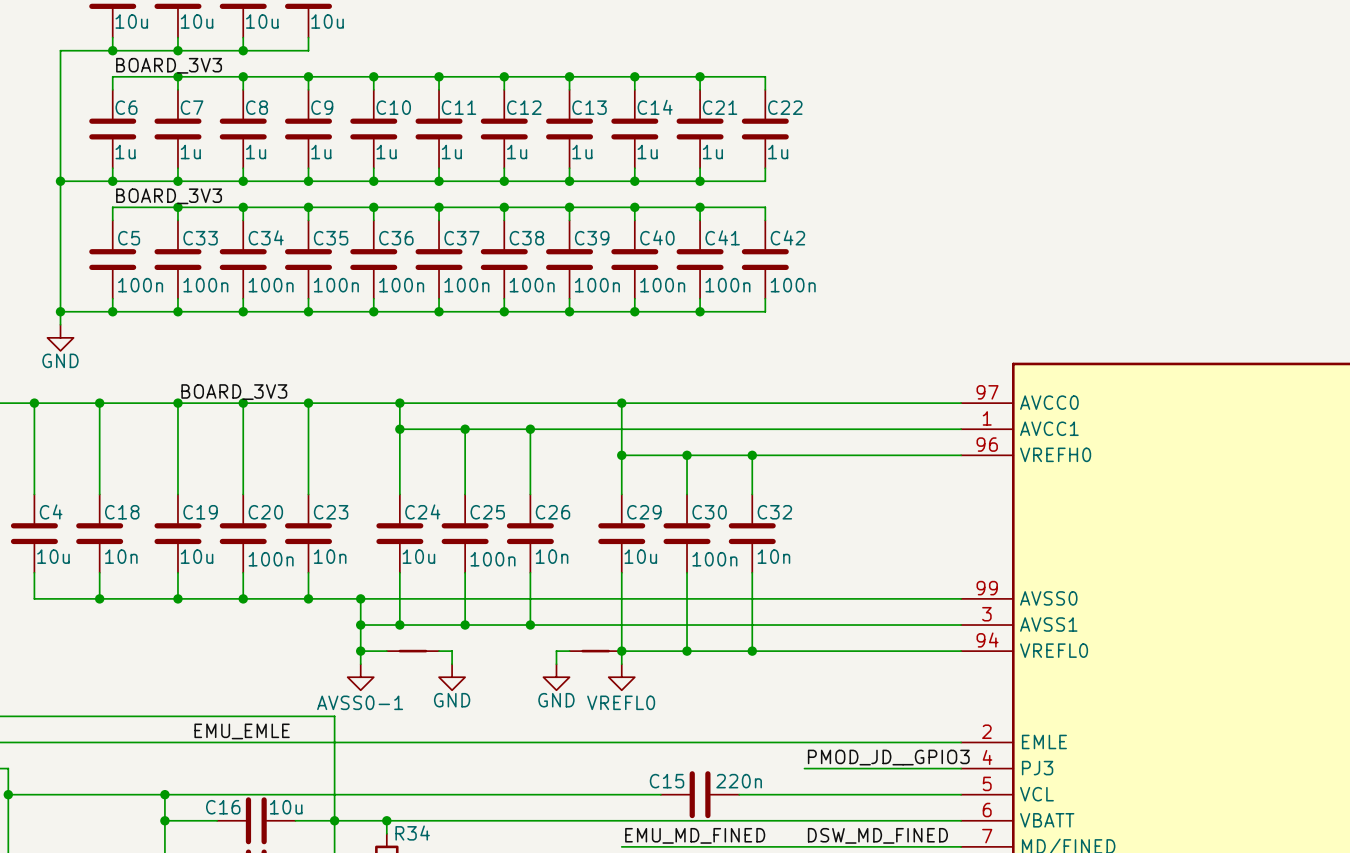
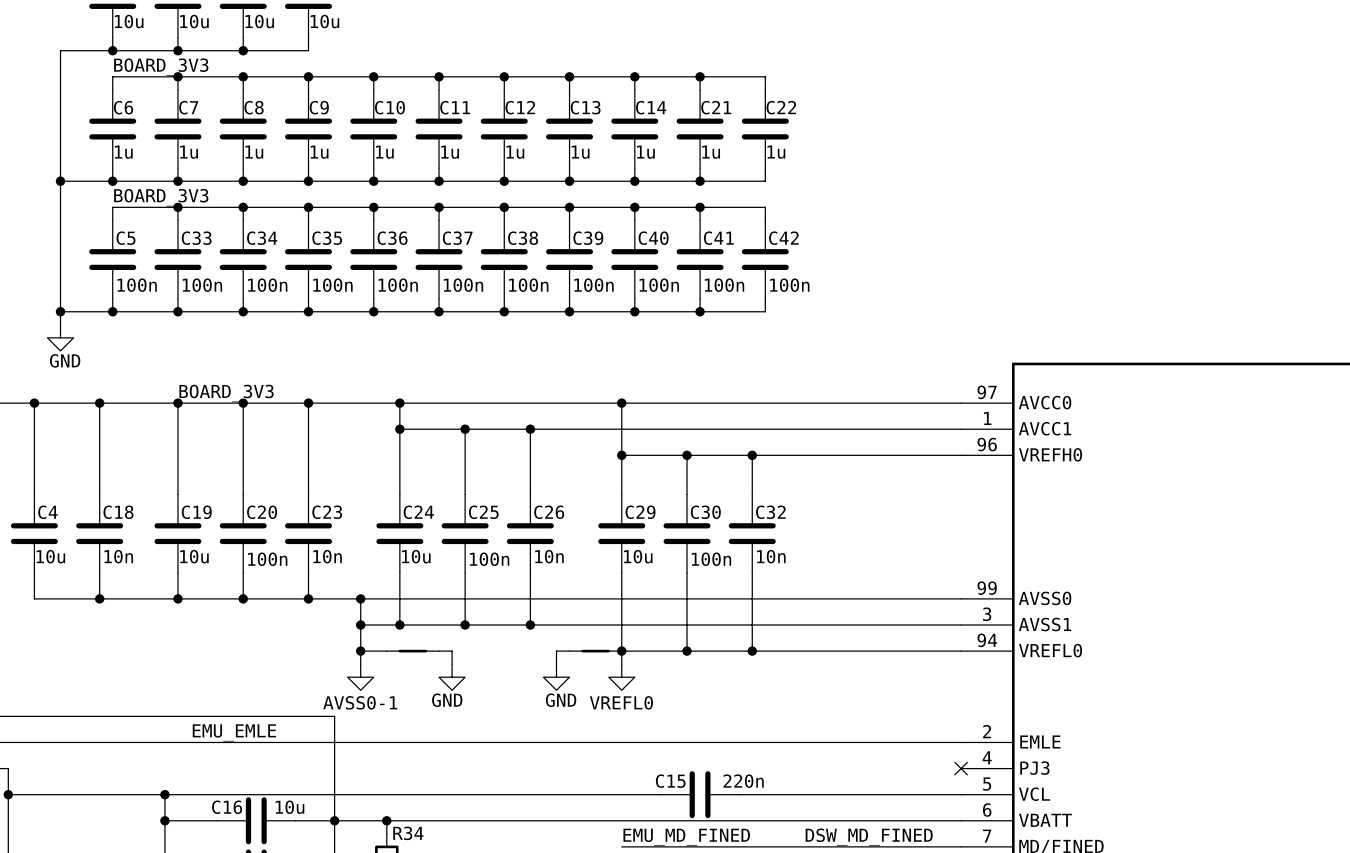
label: PMOD_JD__GPIO3 (888, 757) -> none
wire: (804, 768) (961, 768) -> none
no-connect mark: none -> (961, 768)

